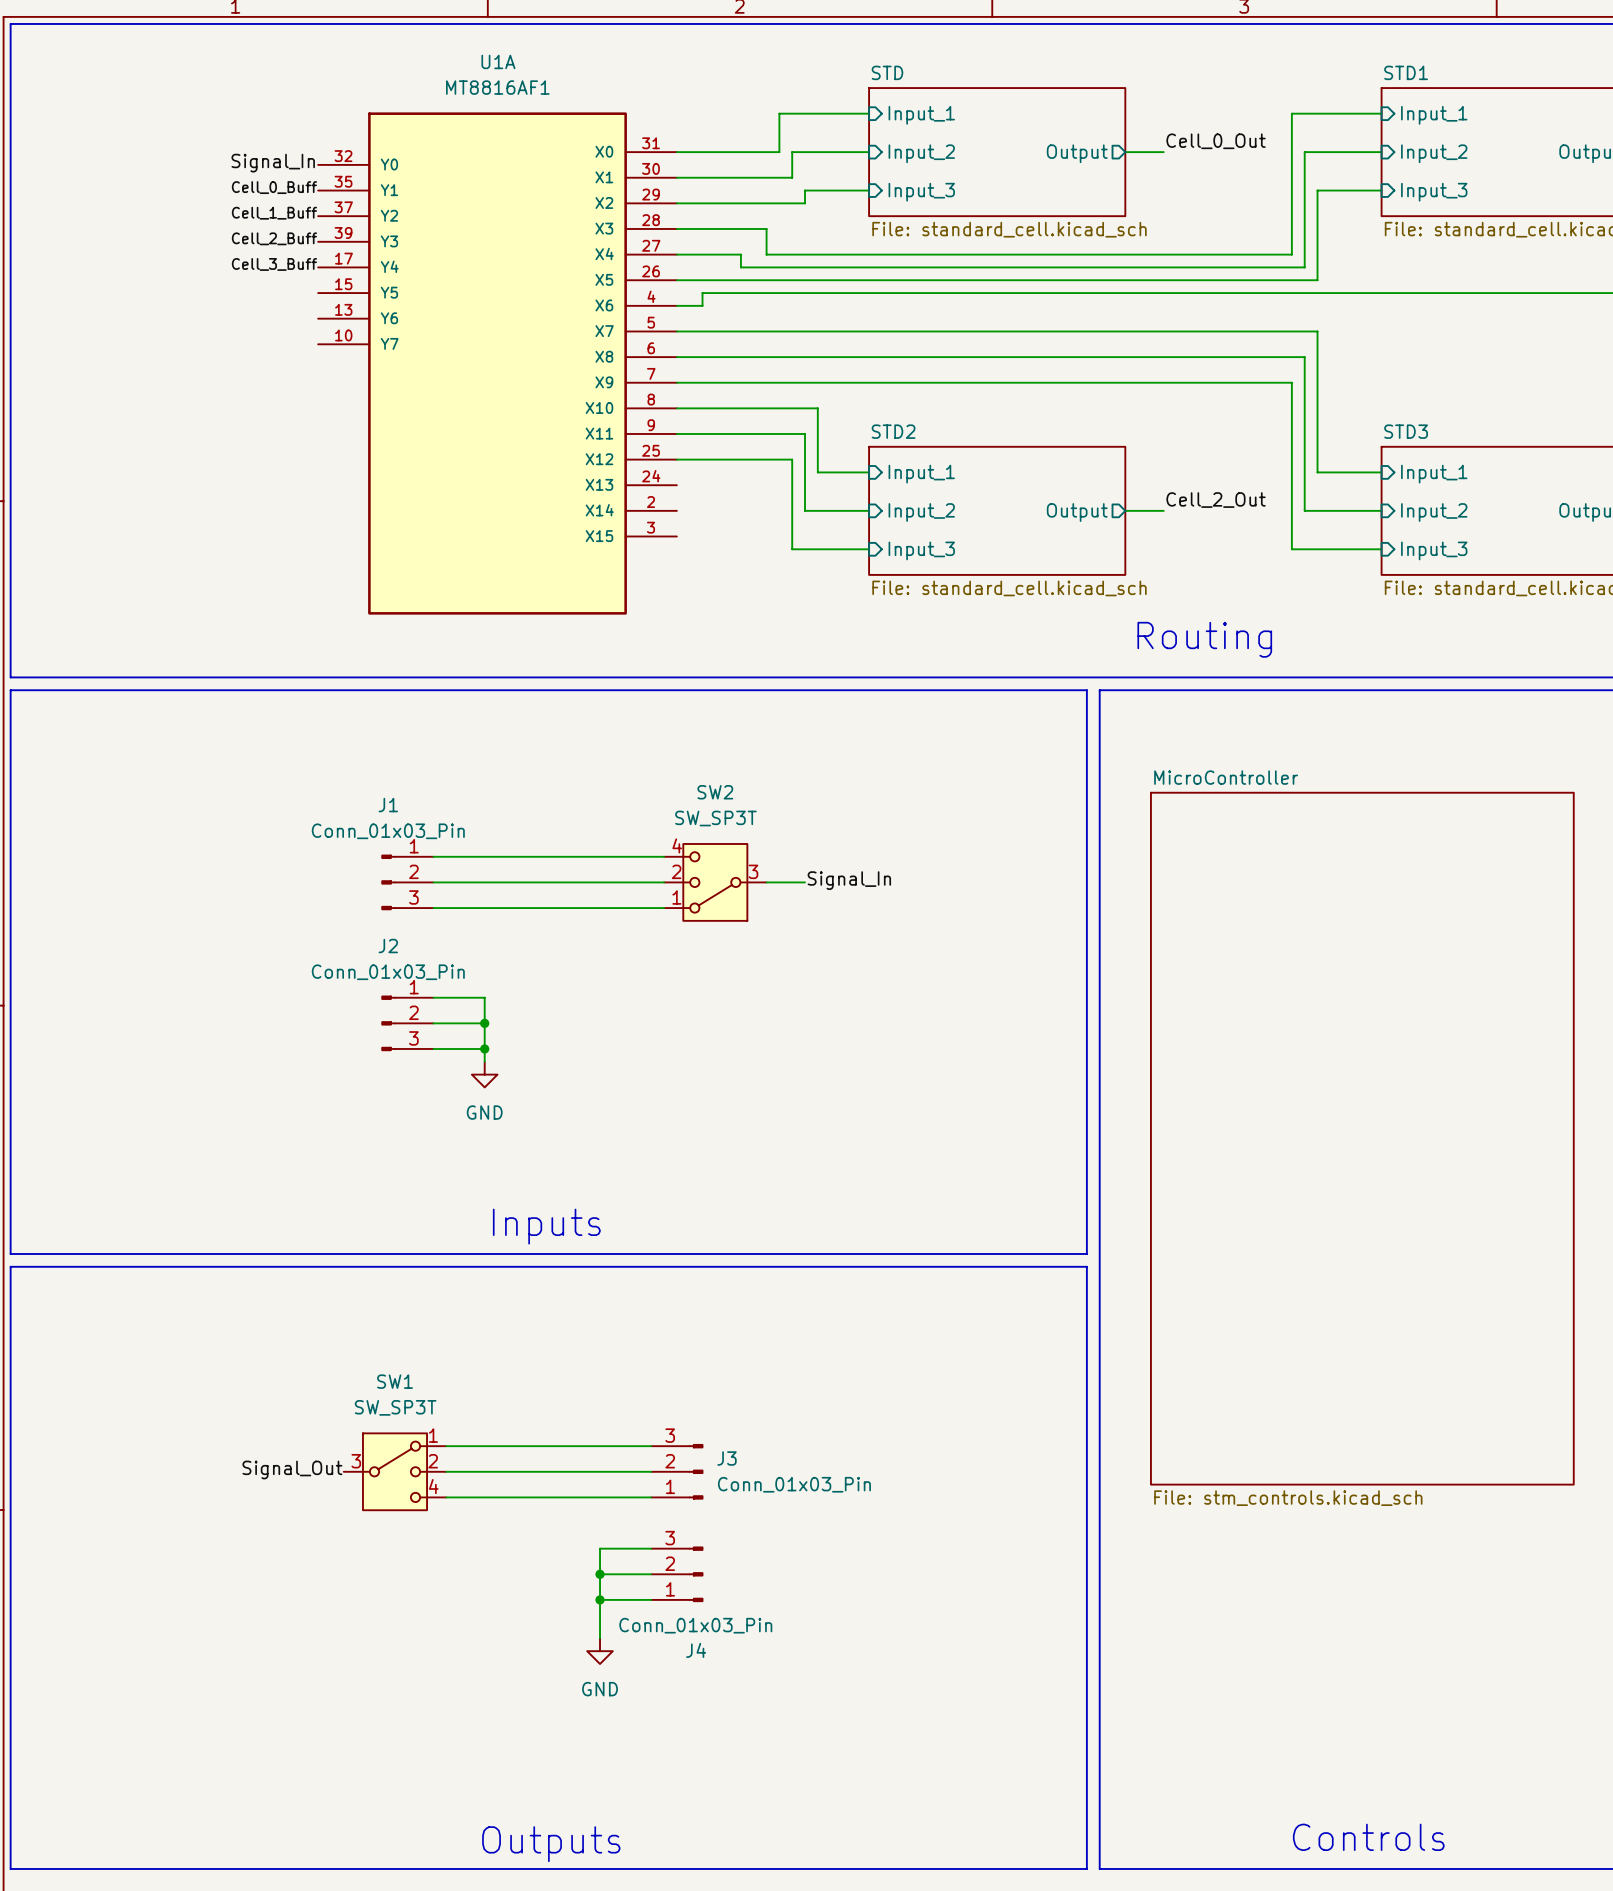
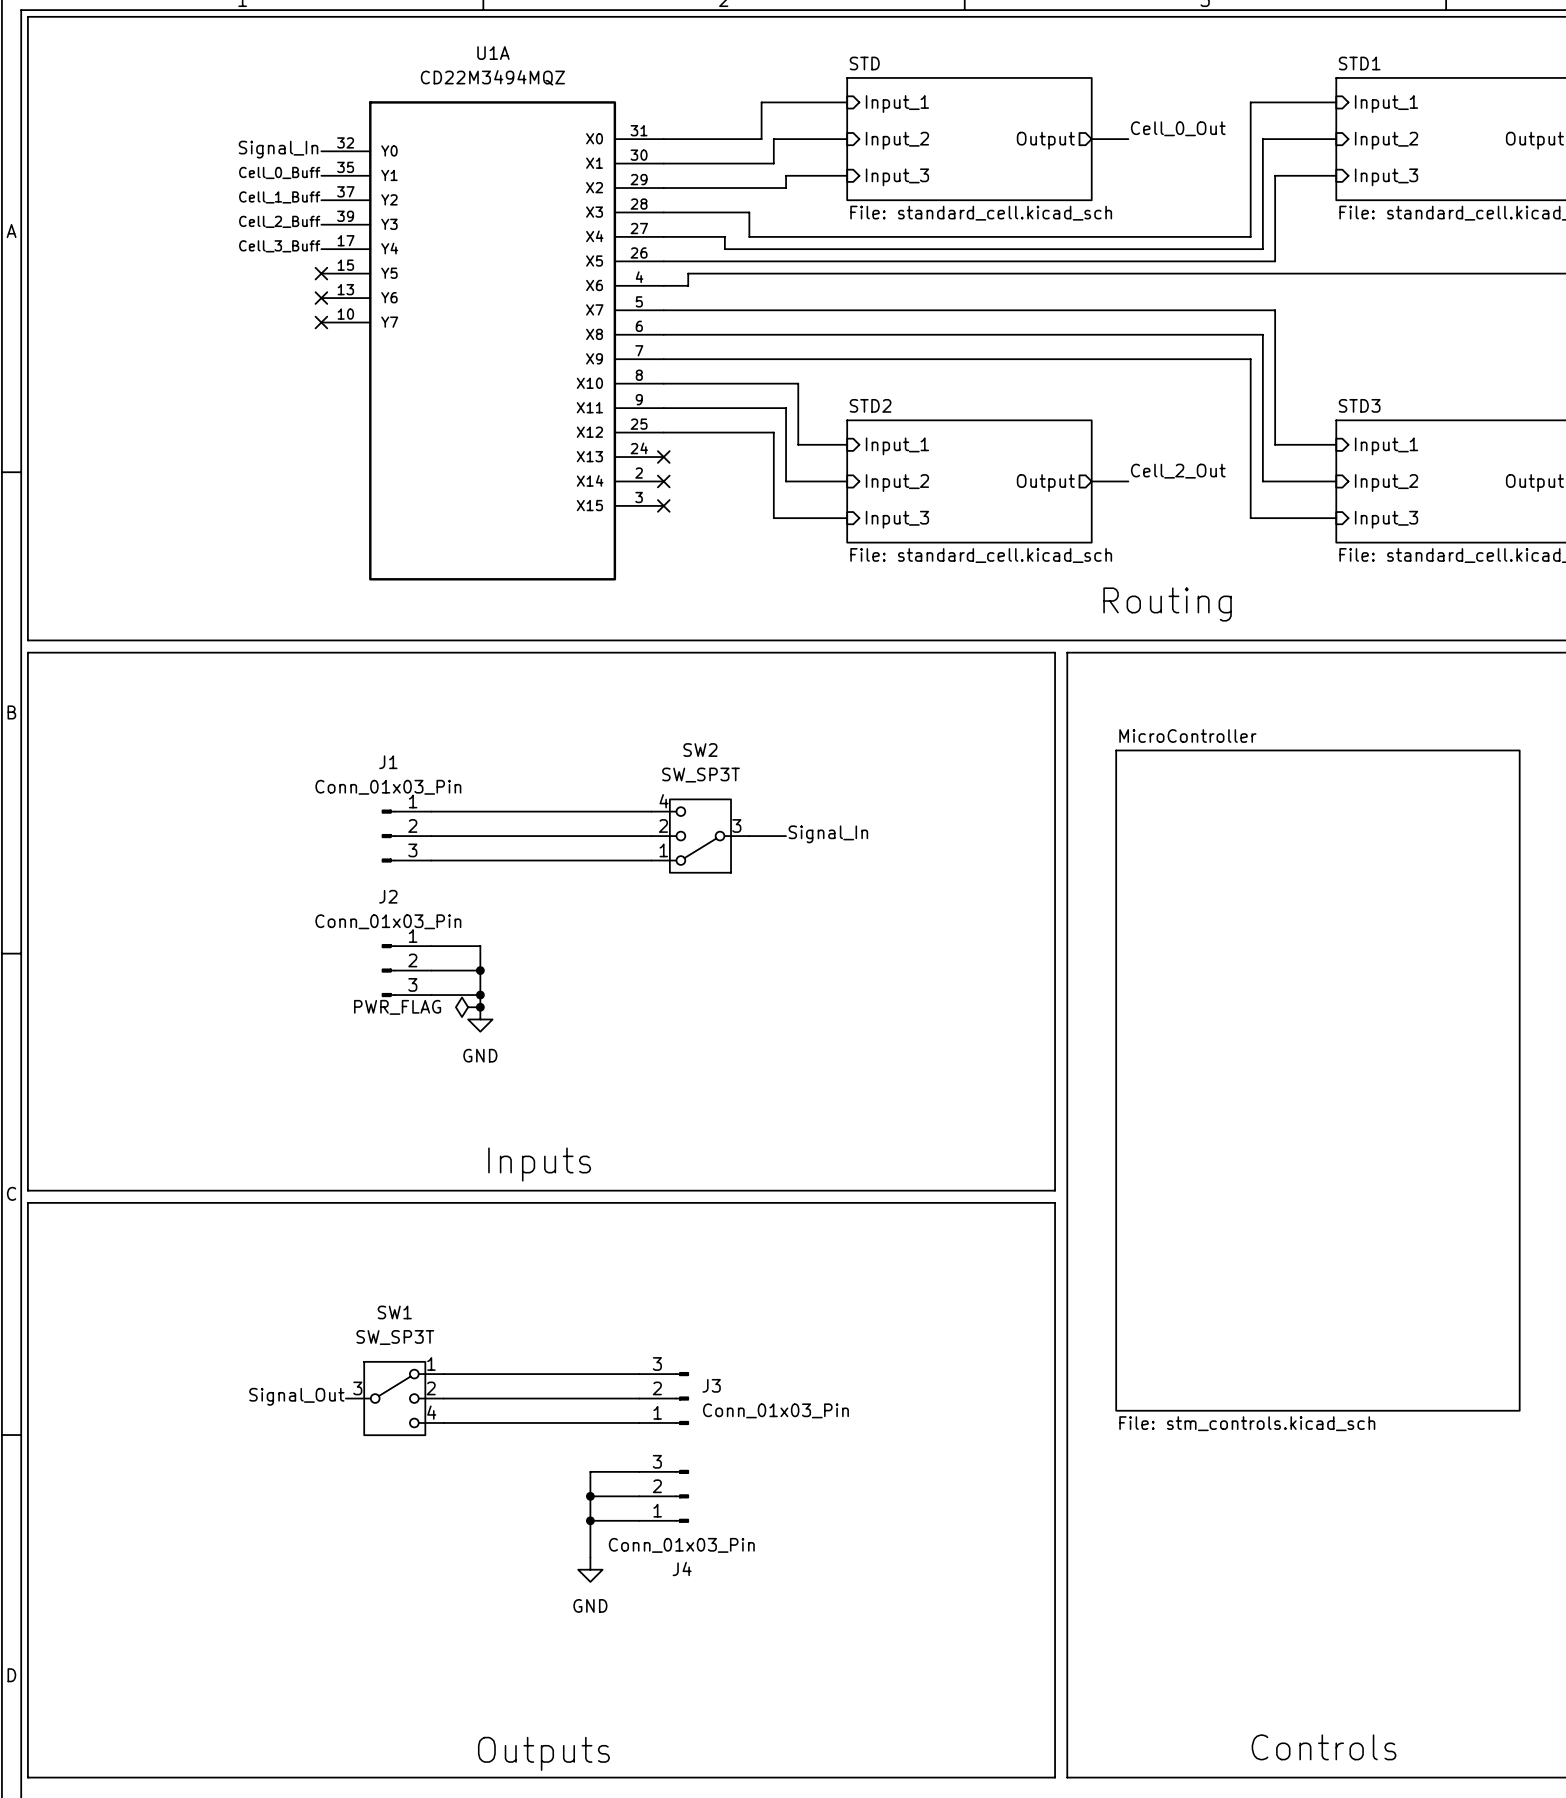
U1A value: MT8816AF1 (497, 87) -> CD22M3494MQZ (492, 77)
no-connect mark: none -> (321, 273)
no-connect mark: none -> (321, 298)
no-connect mark: none -> (321, 322)
no-connect mark: none -> (663, 457)
no-connect mark: none -> (663, 481)
no-connect mark: none -> (663, 505)
power symbol: none -> PWR_FLAG (468, 1007)
junction: none -> (480, 1007)

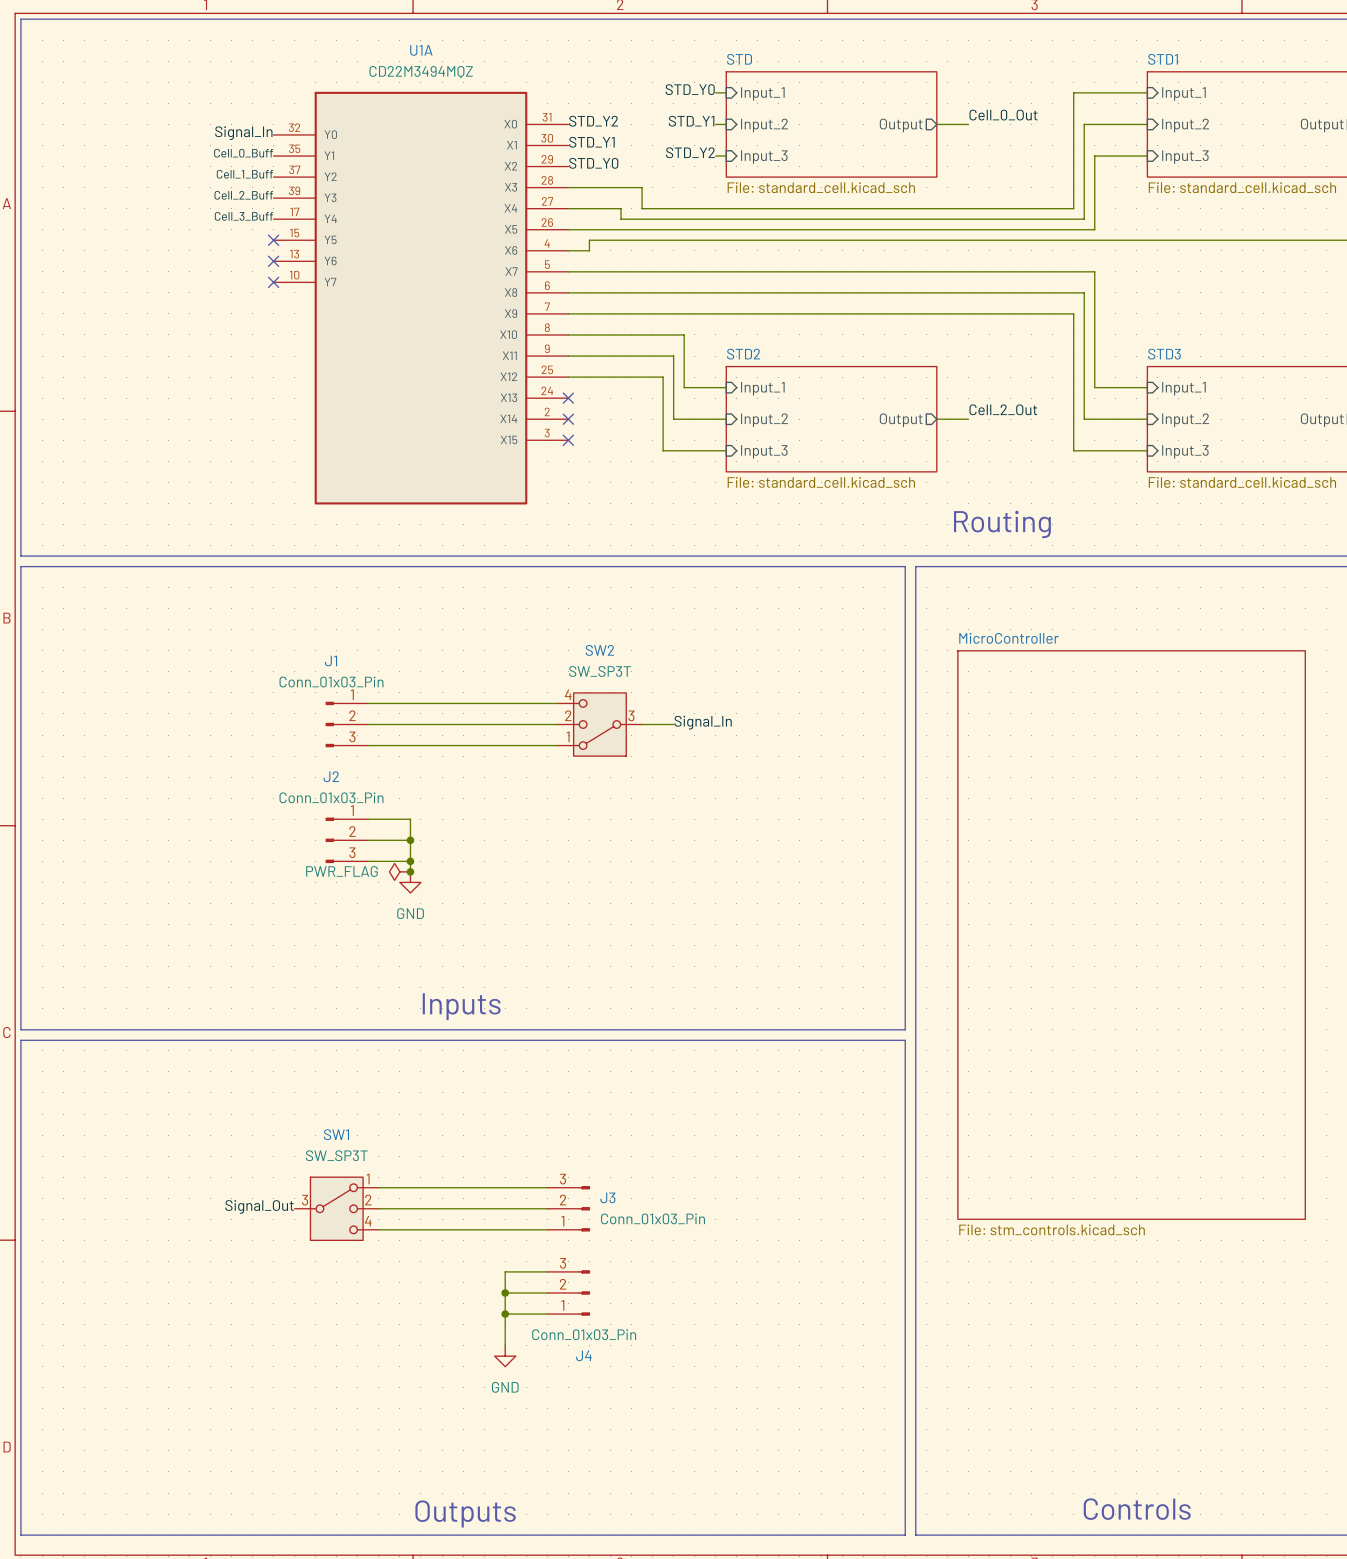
label: none -> STD_Y0 (690, 89)
wire: (834, 102) (761, 102) (761, 139) (663, 139) -> none
label: none -> STD_Y2 (593, 121)
label: none -> STD_Y1 (691, 121)
wire: (834, 139) (773, 139) (773, 163) (663, 163) -> none
label: none -> STD_Y1 (591, 142)
label: none -> STD_Y2 (690, 152)
wire: (834, 175) (786, 175) (786, 188) (663, 188) -> none
label: none -> STD_Y0 (593, 163)

